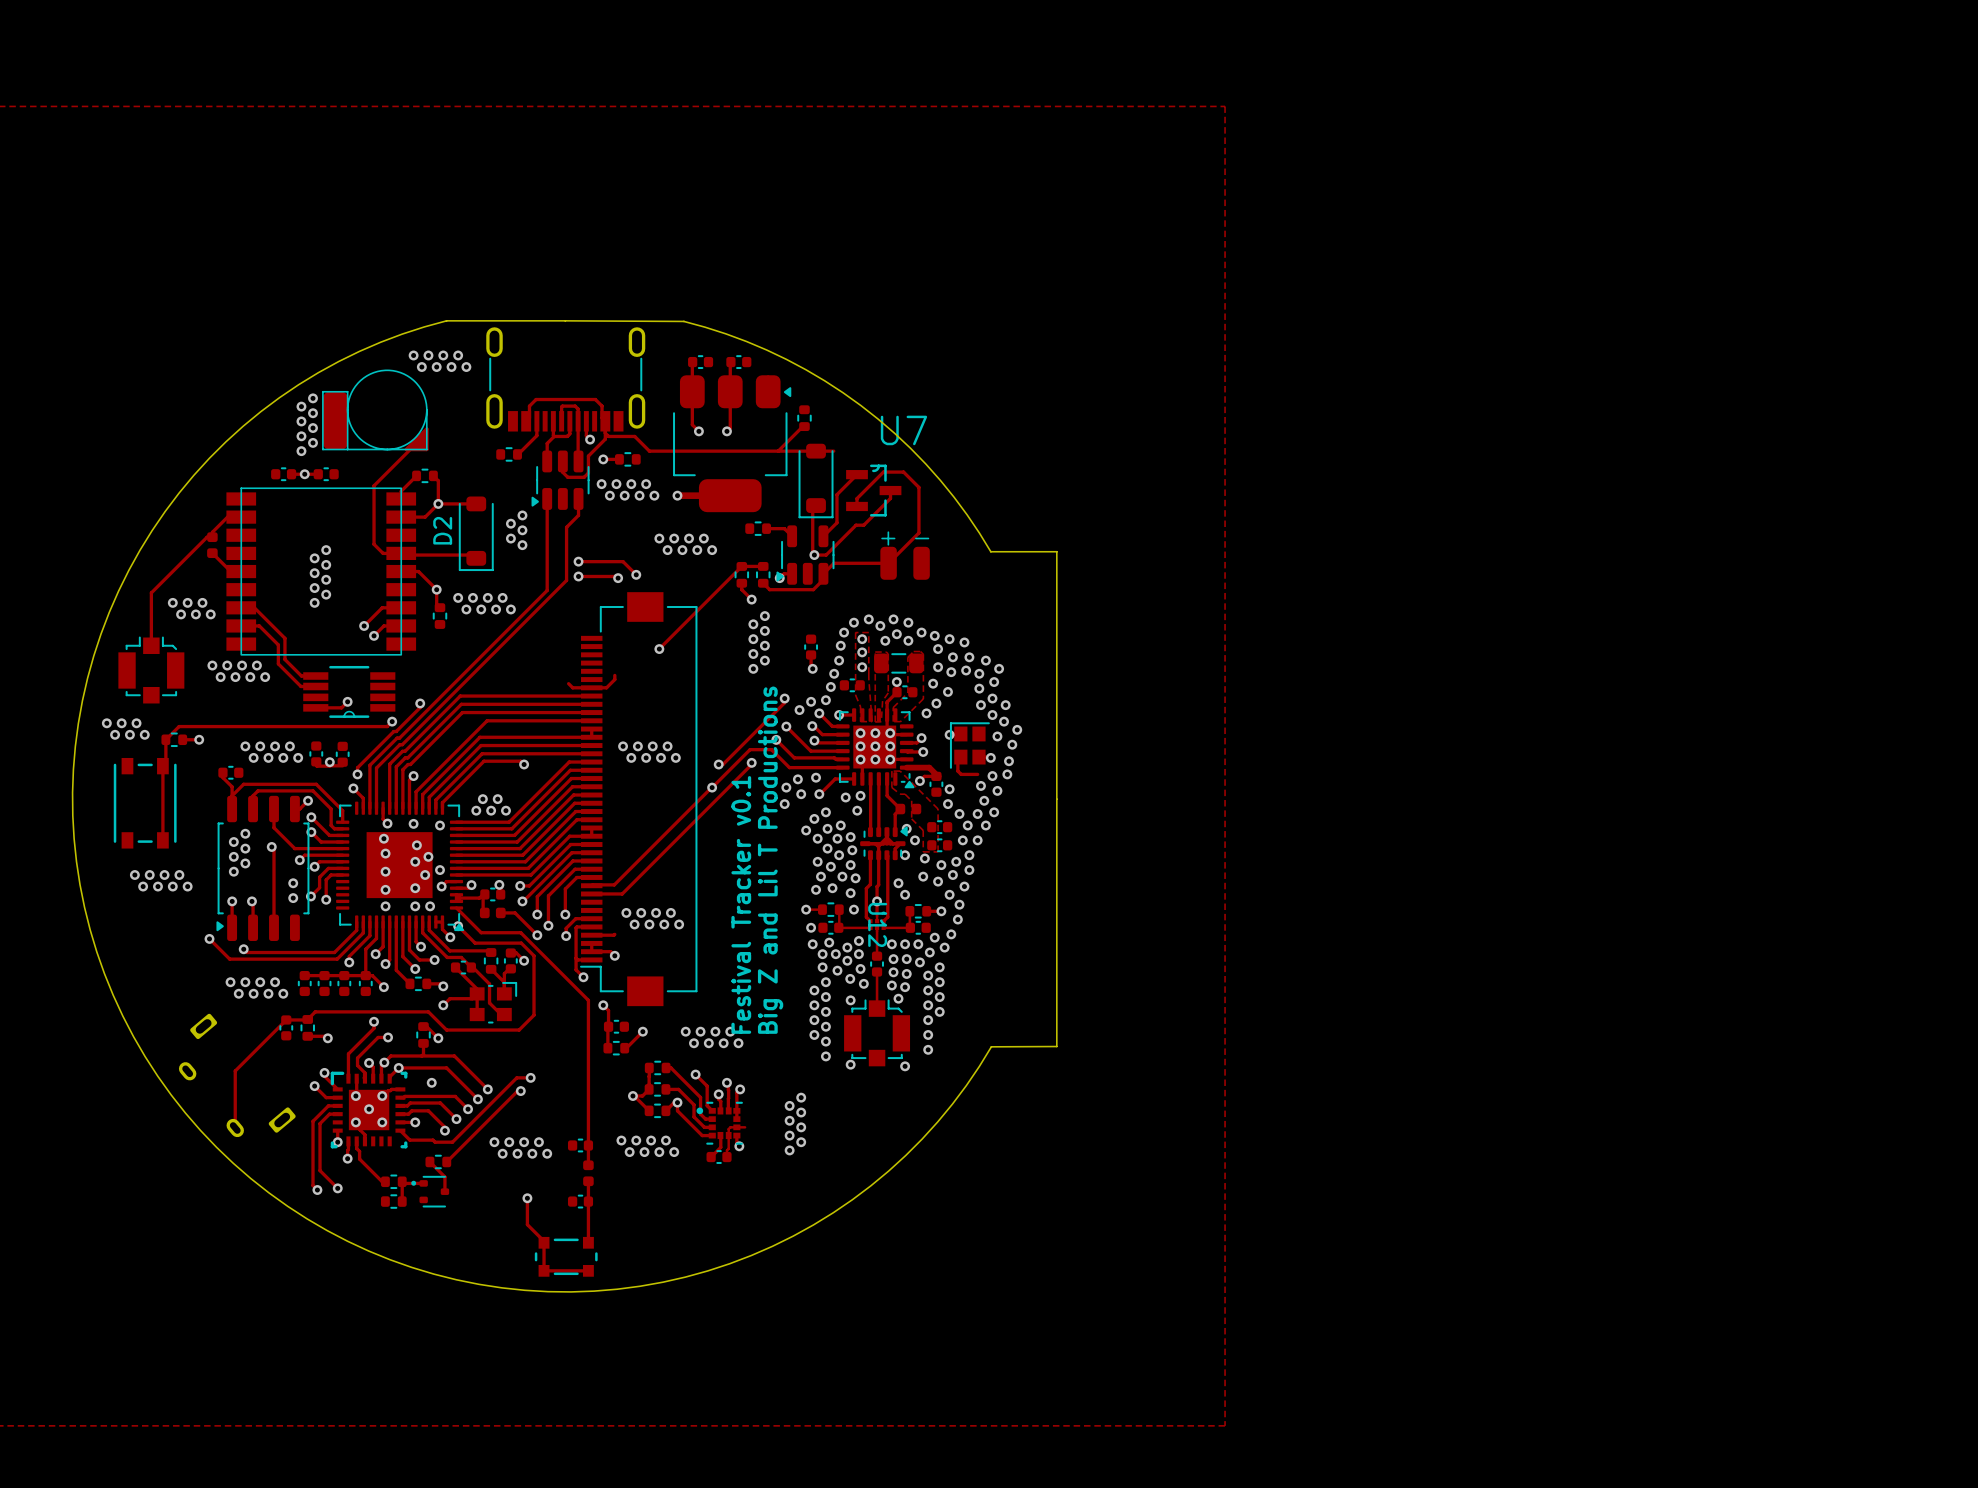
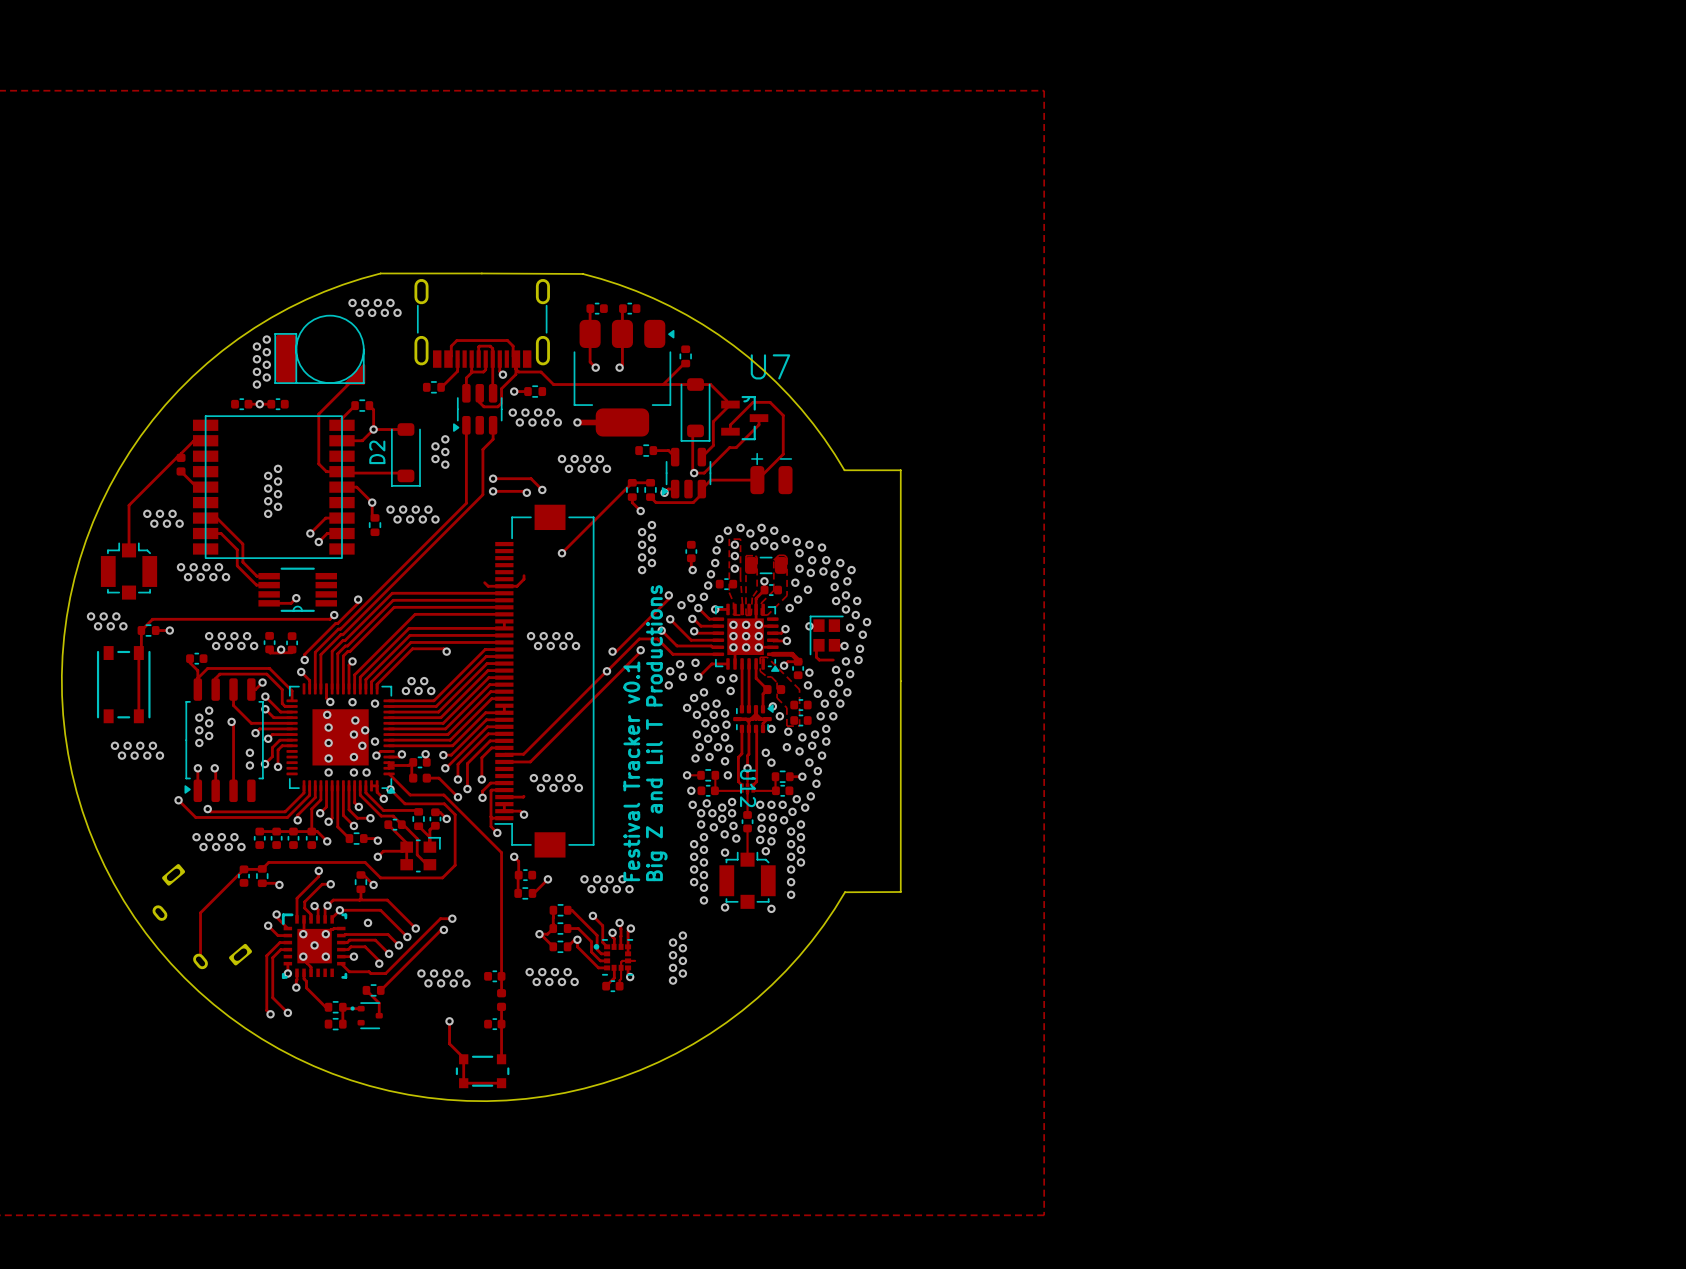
track: none -> (710, 384) (726, 400)

